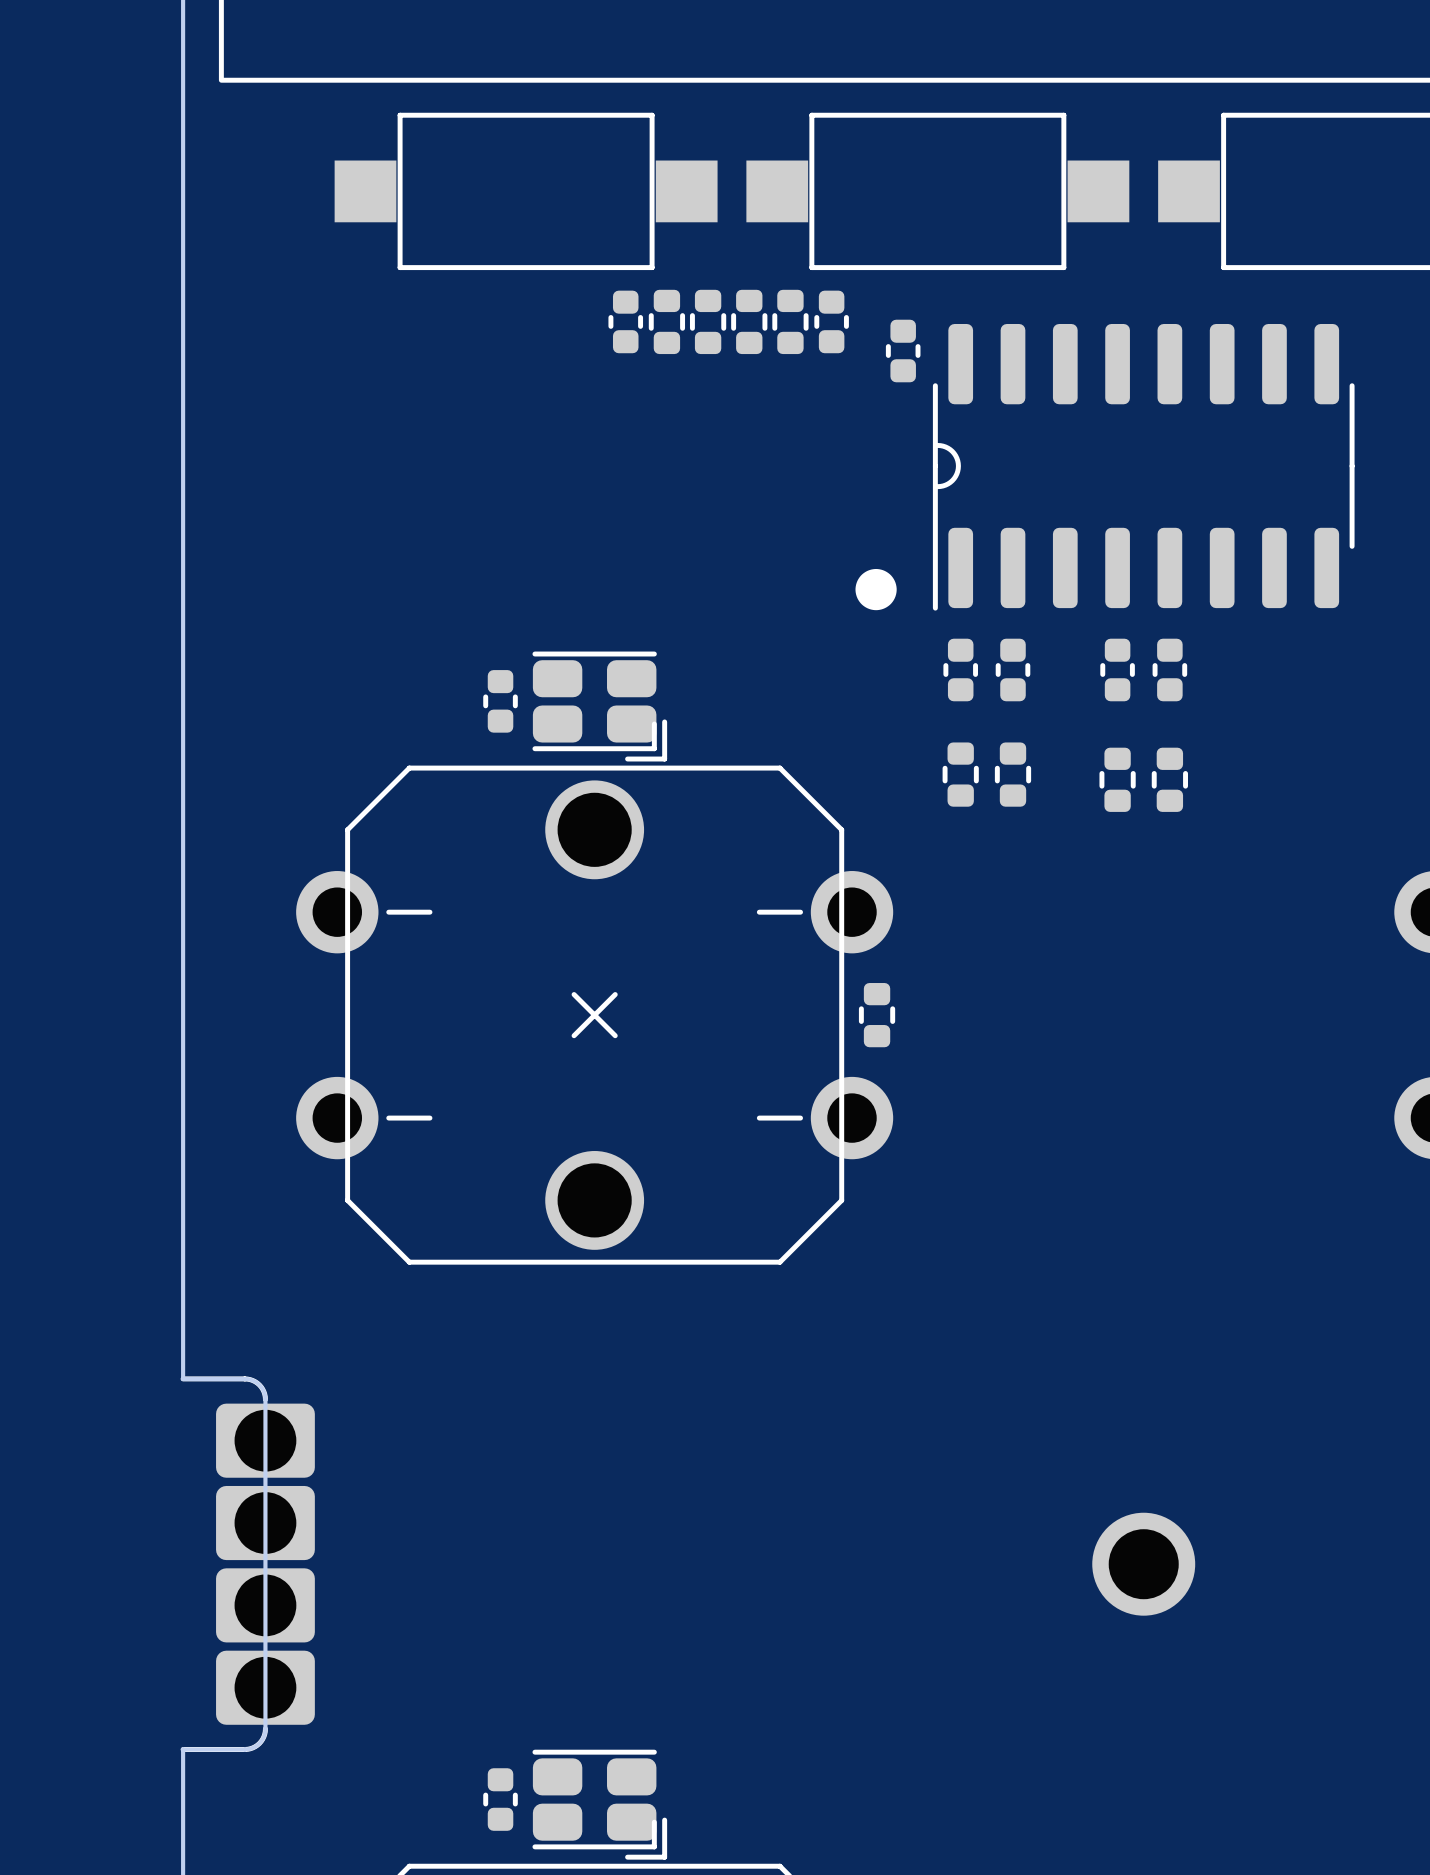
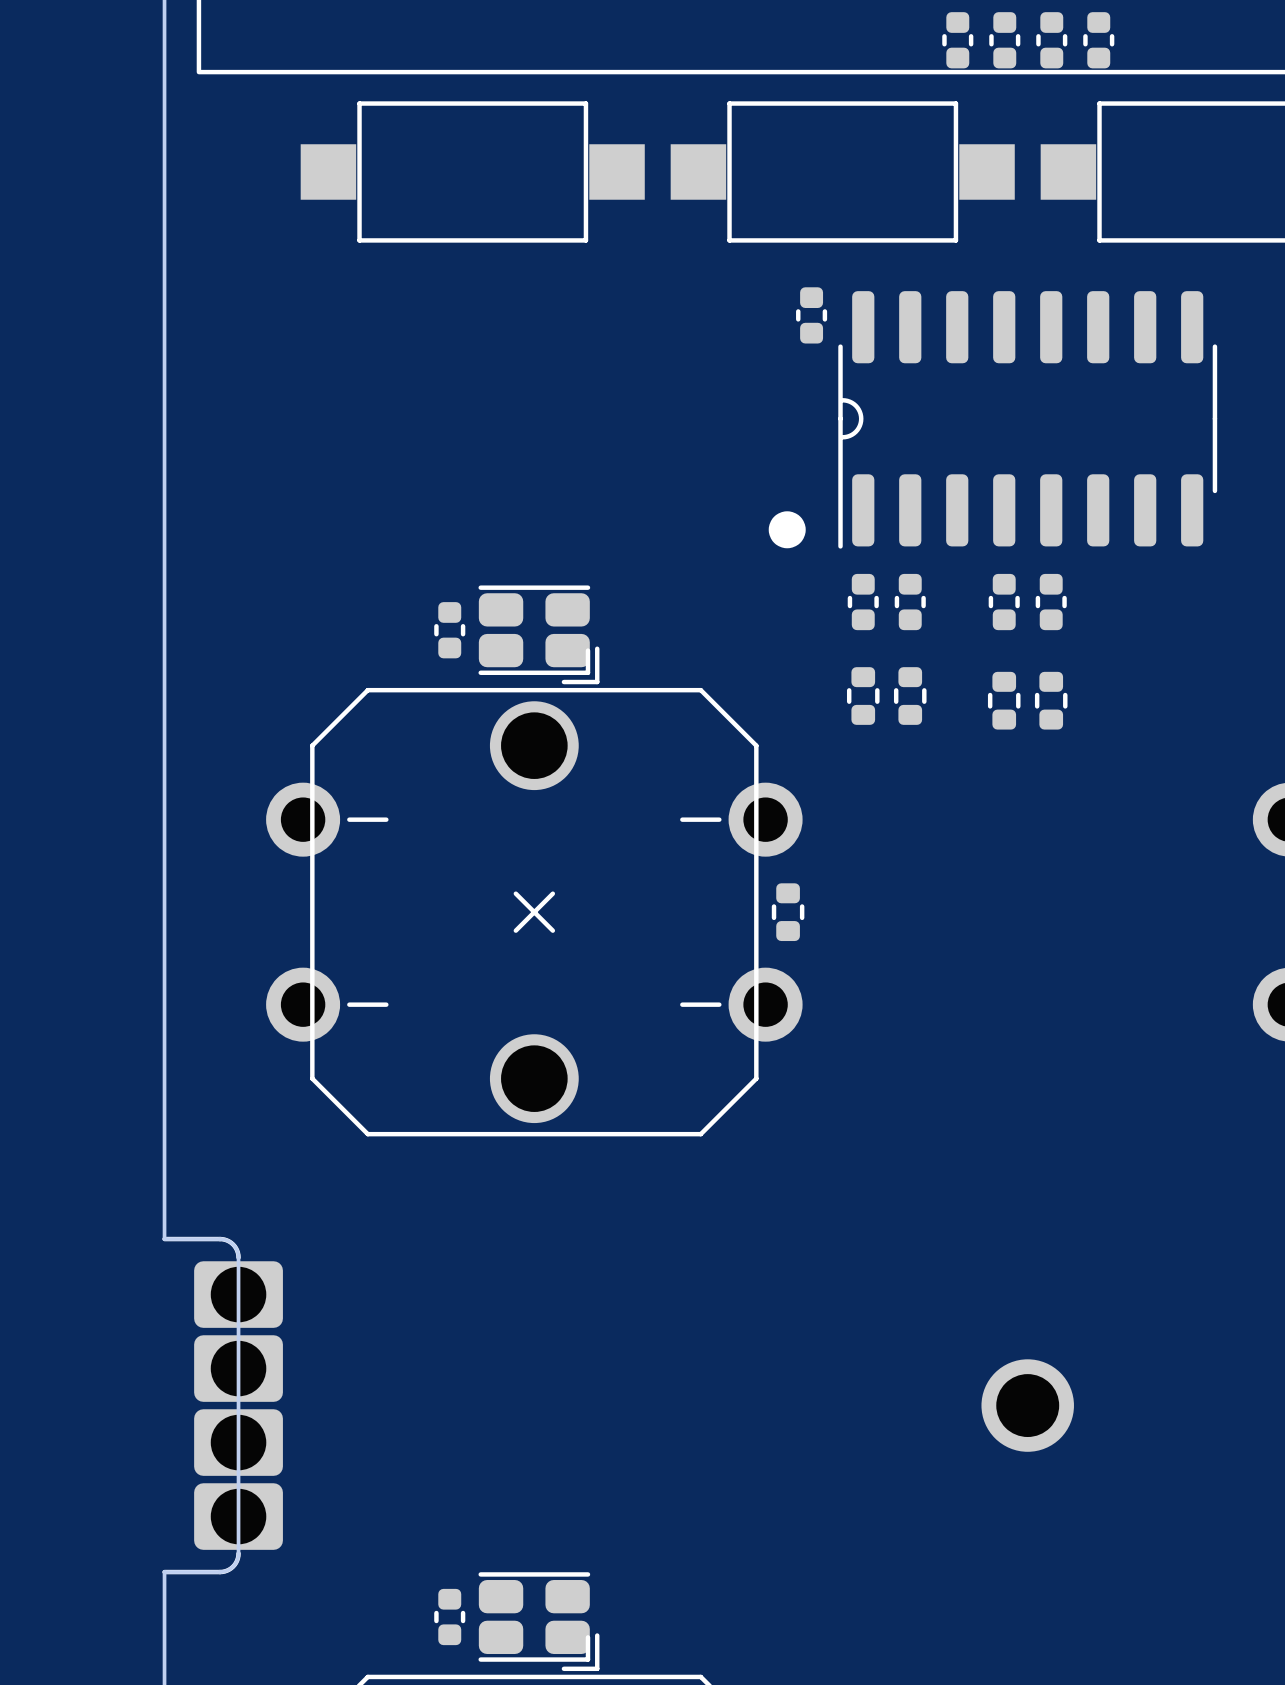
part: none -> (957, 40)
part: none -> (1004, 40)
part: none -> (1051, 40)
part: none -> (1098, 40)
part: (625, 321) -> none
part: (666, 321) -> none
part: (708, 321) -> none
part: (749, 321) -> none
part: (790, 321) -> none
part: (831, 321) -> none

